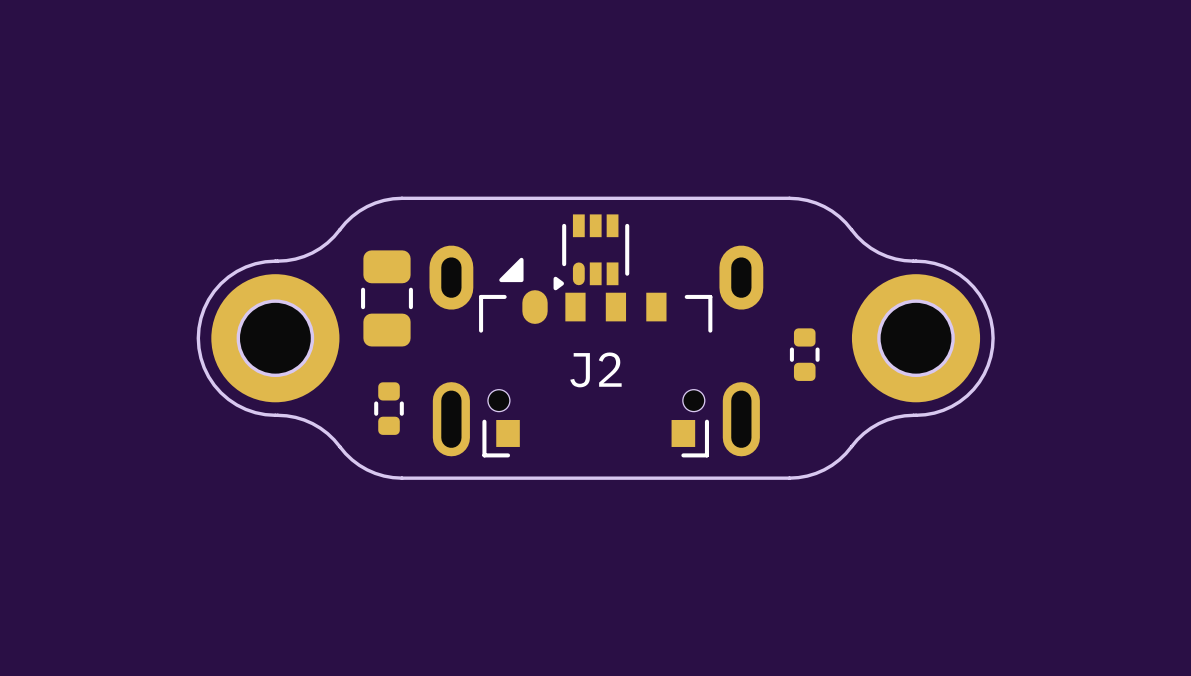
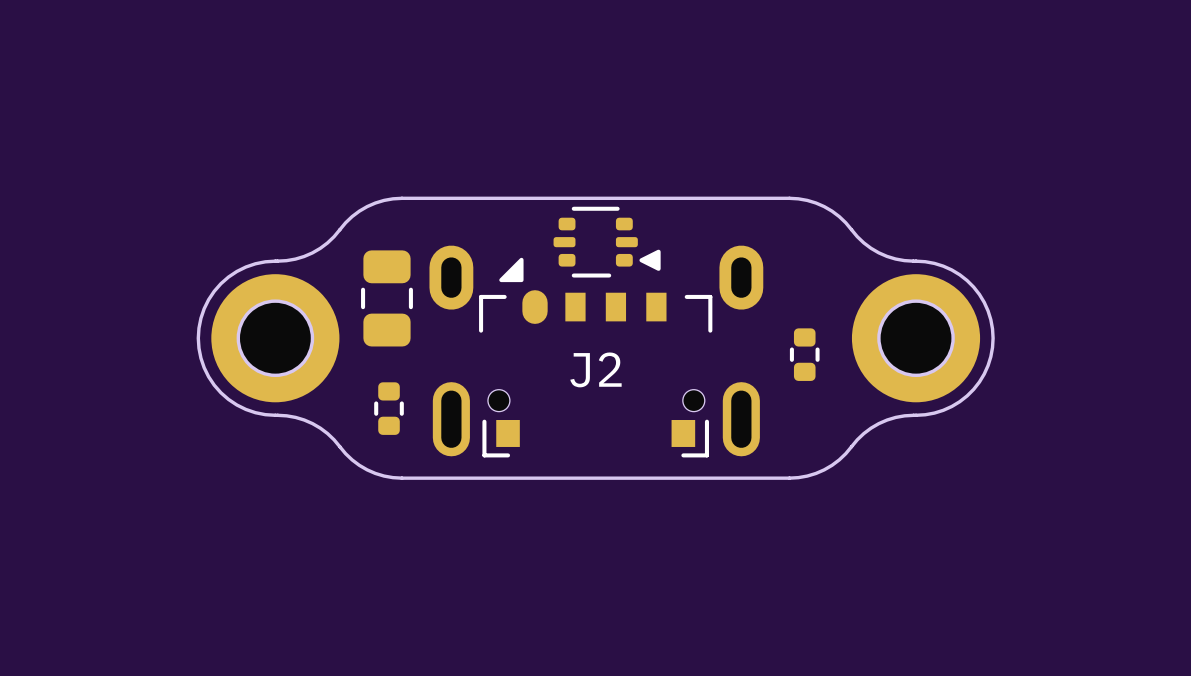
part footprint: [553, 214, 630, 291] -> [553, 206, 661, 278]

